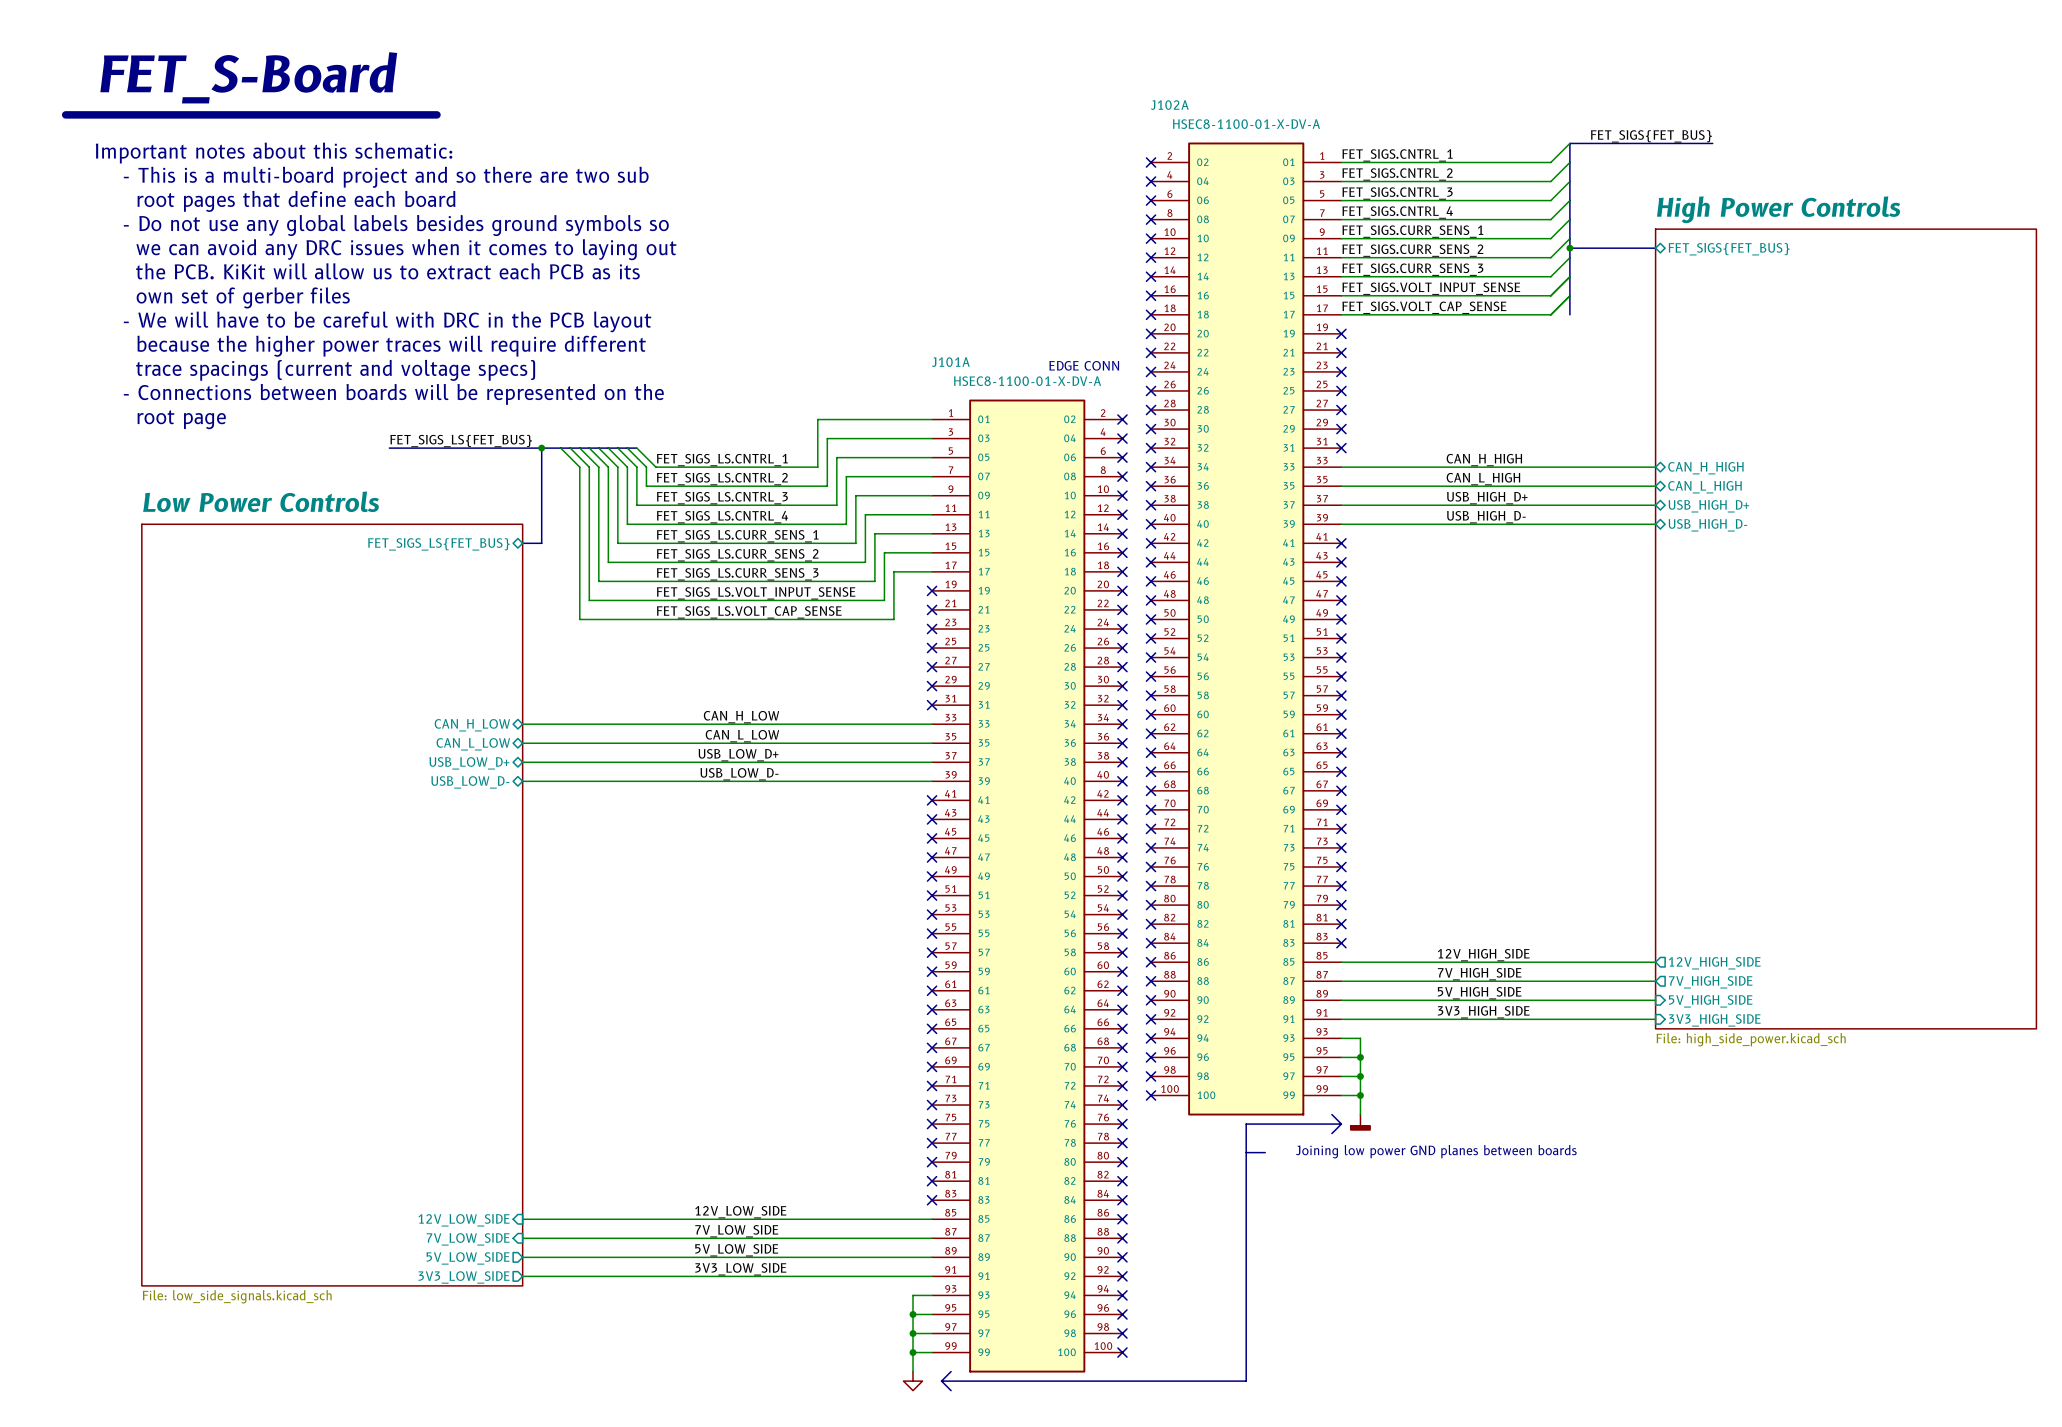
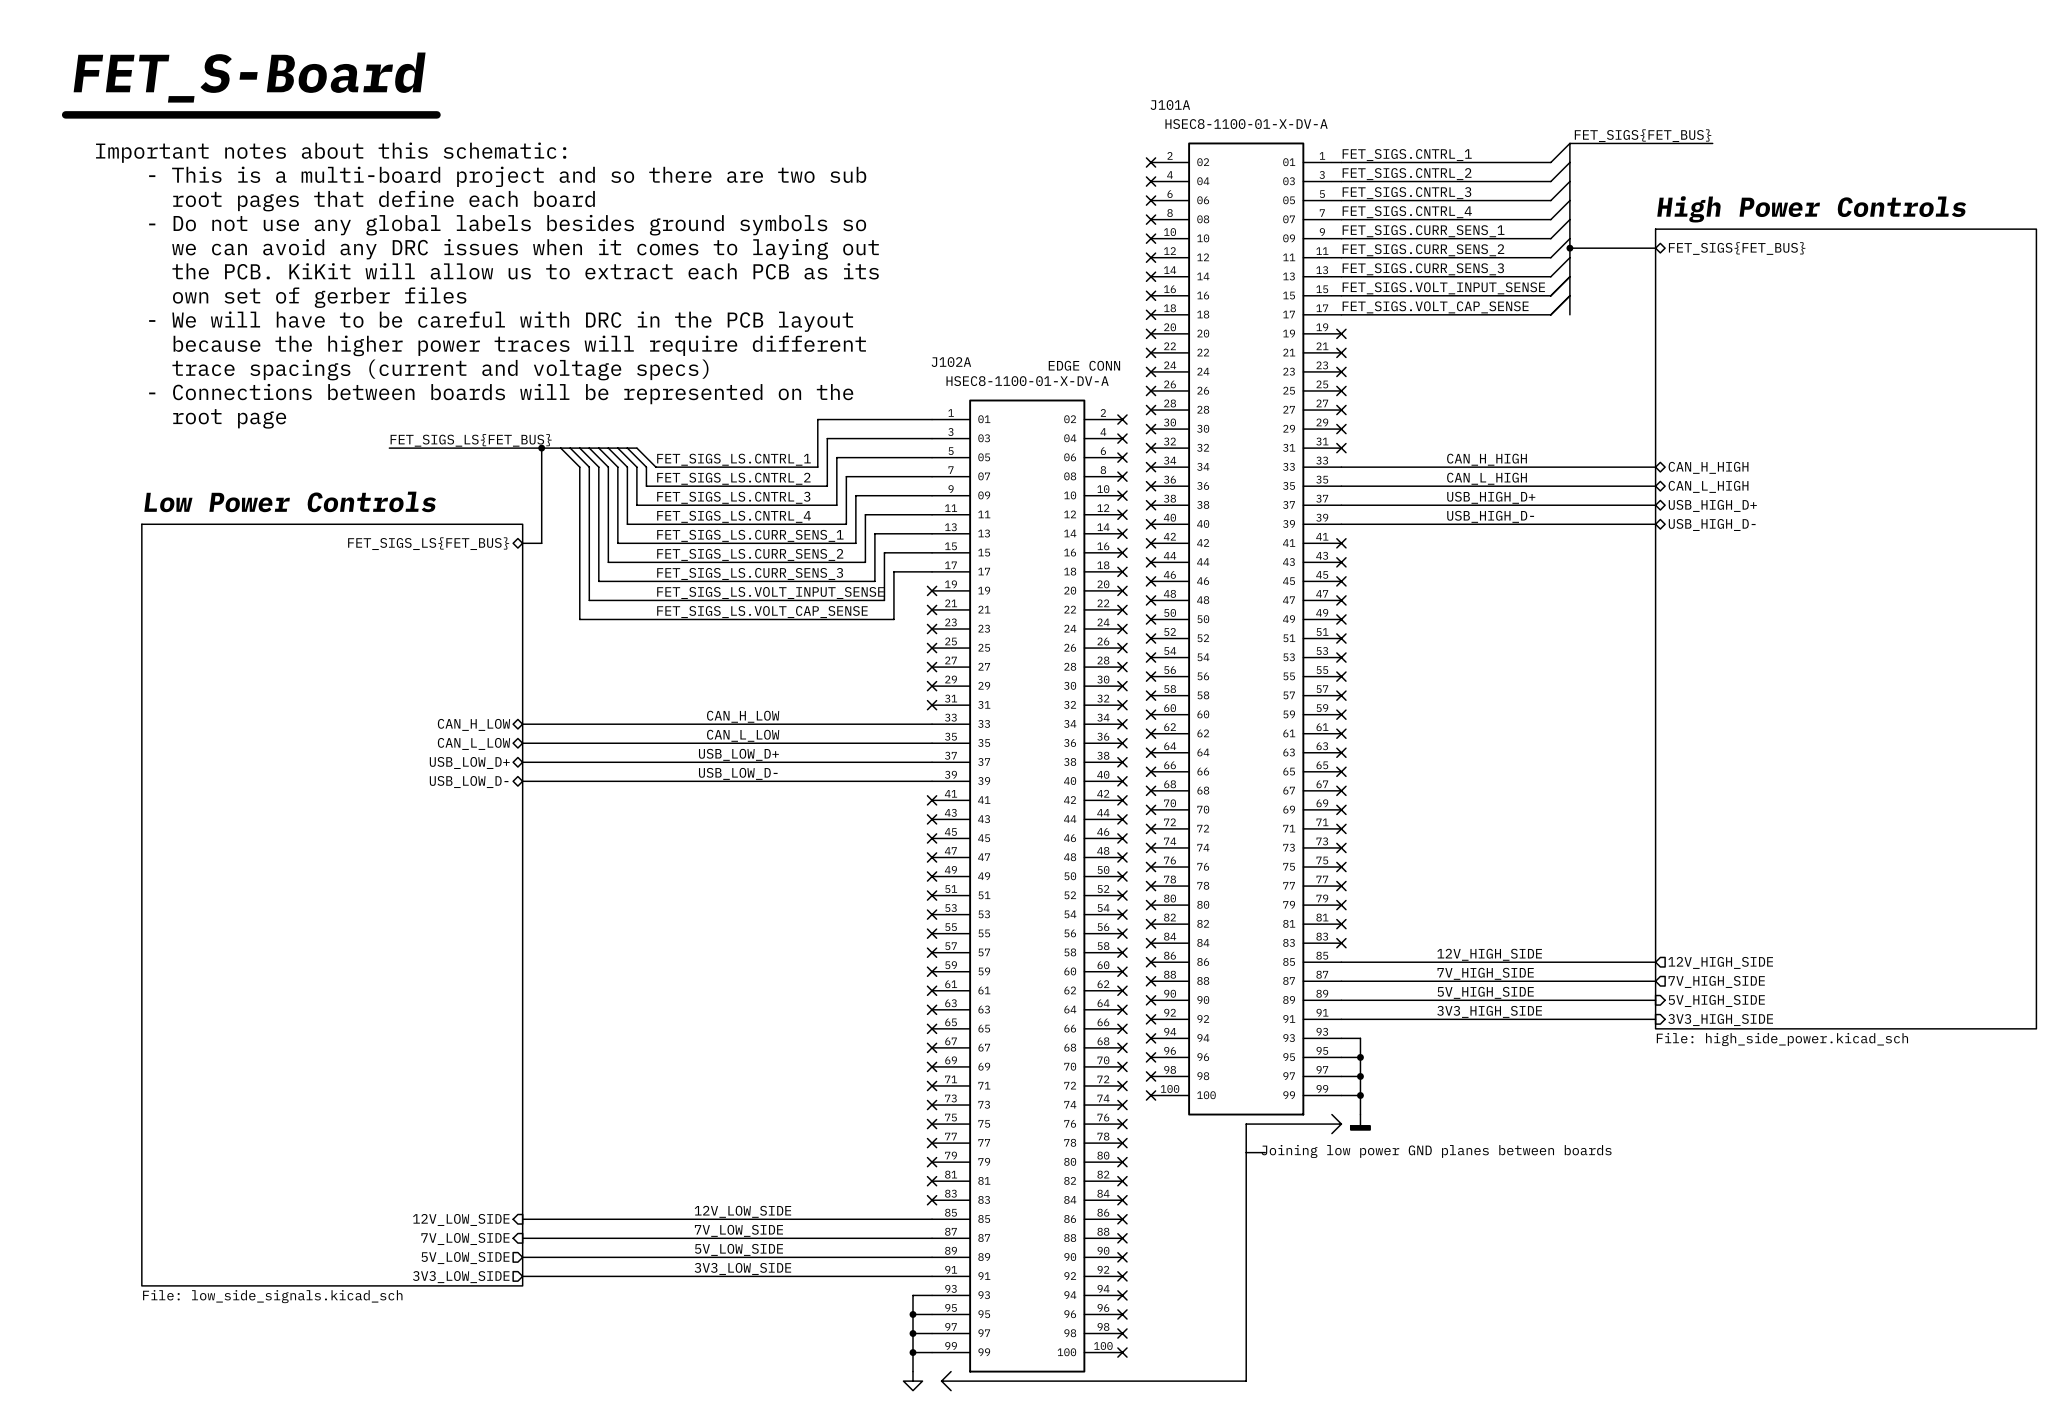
J102A name: J102A (1169, 105) -> J101A (1170, 105)
J101A name: J101A (950, 362) -> J102A (951, 362)

